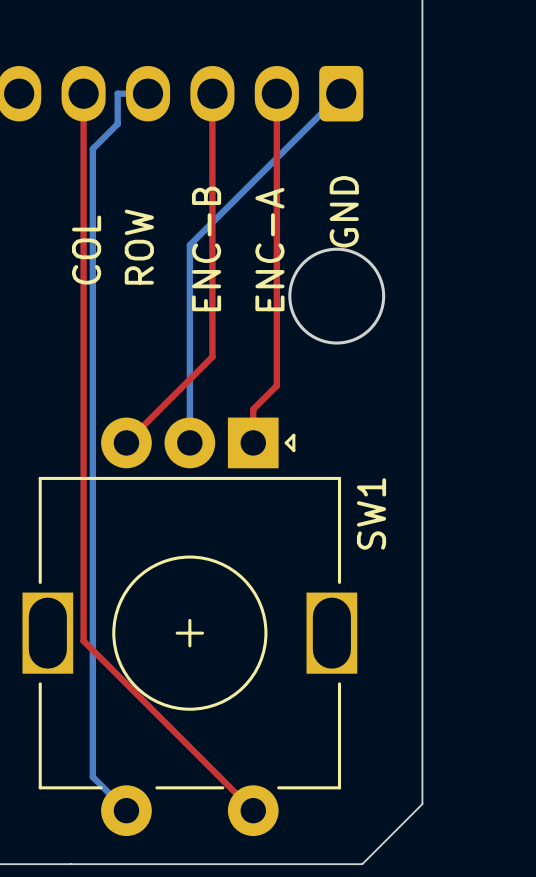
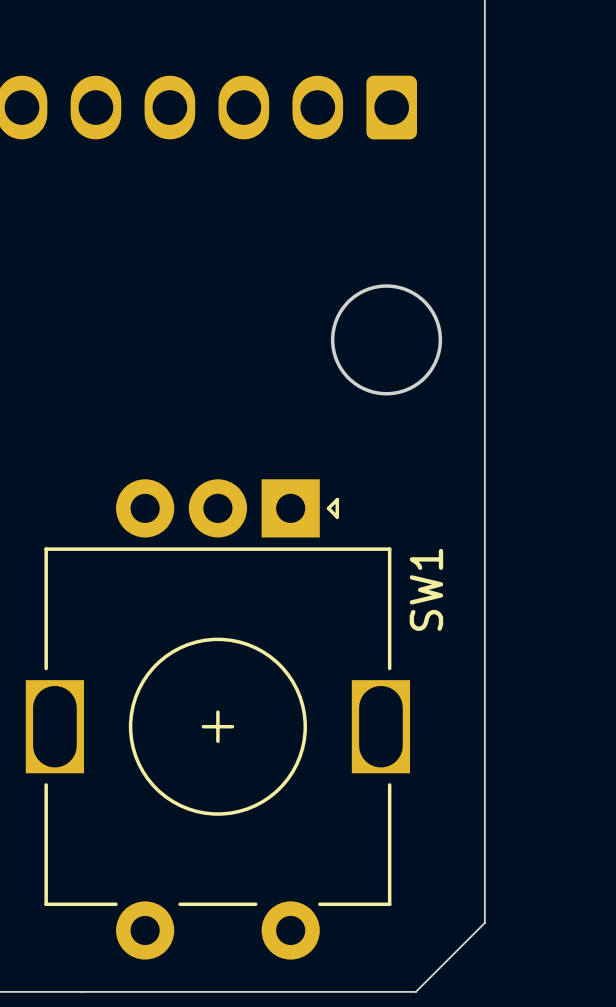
top track: (83, 93) (83, 641) (253, 810) -> none
bottom track: (148, 93) (117, 93) (117, 124) (92, 148) (92, 777) (126, 810) -> none
top track: (212, 93) (212, 356) (126, 442) -> none
top track: (276, 93) (276, 385) (253, 409) (253, 442) -> none
bottom track: (341, 93) (189, 245) (189, 442) -> none
text: GND (344, 211) -> none
text: ROW (139, 247) -> none
text: ENC-B (206, 248) -> none
text: ENC-A (269, 249) -> none
text: COL (86, 250) -> none

